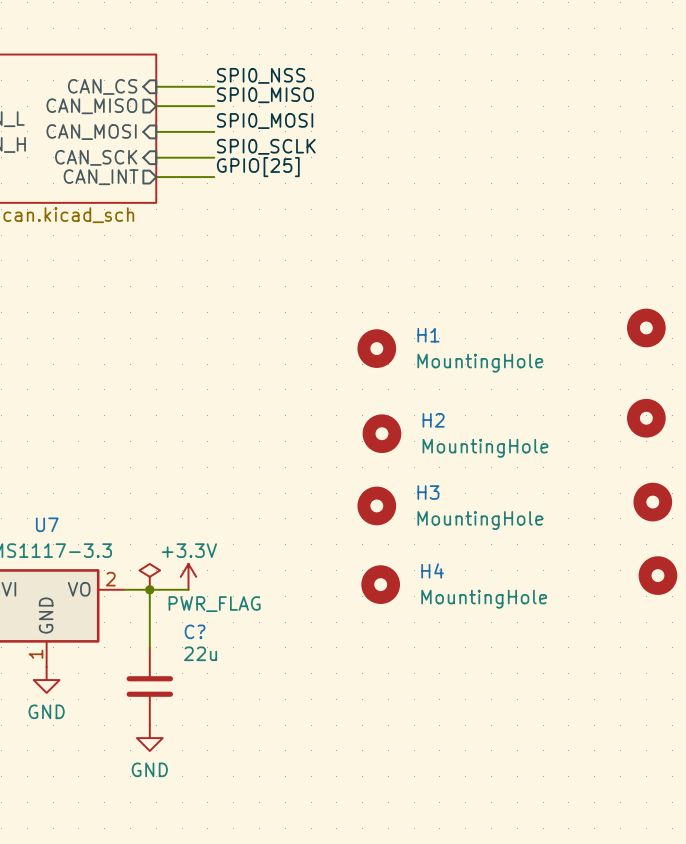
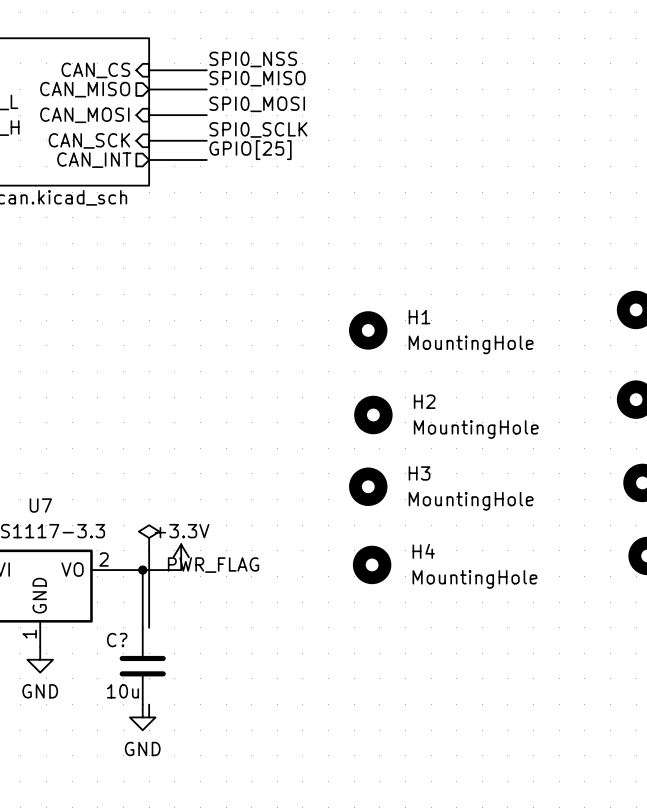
wire: none -> (149, 550) (149, 627)
power symbol position: PWR_FLAG (149, 576) -> PWR_FLAG (149, 538)
C? name position: C? (195, 631) -> C? (117, 640)
C? value: 22u (200, 653) -> 10u (122, 691)
wire: none -> (149, 704) (149, 717)

